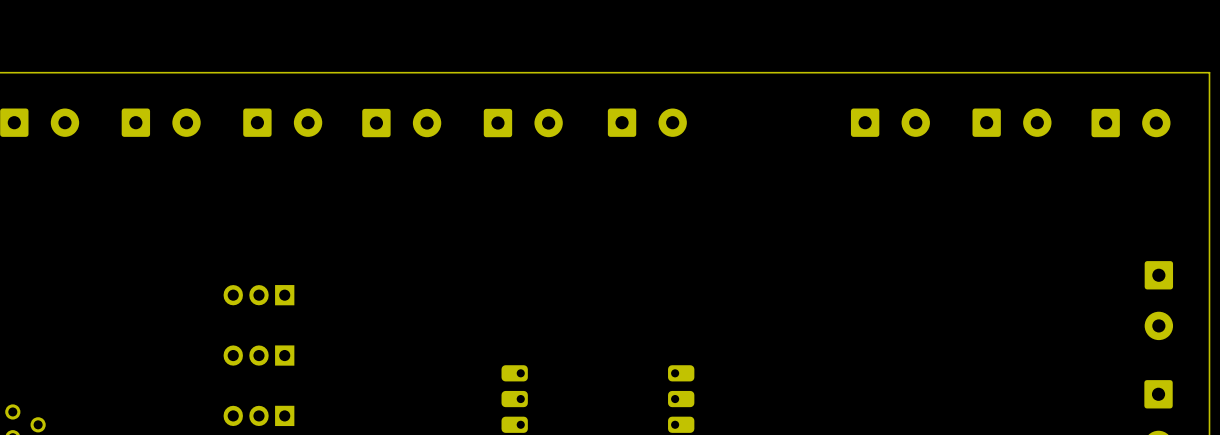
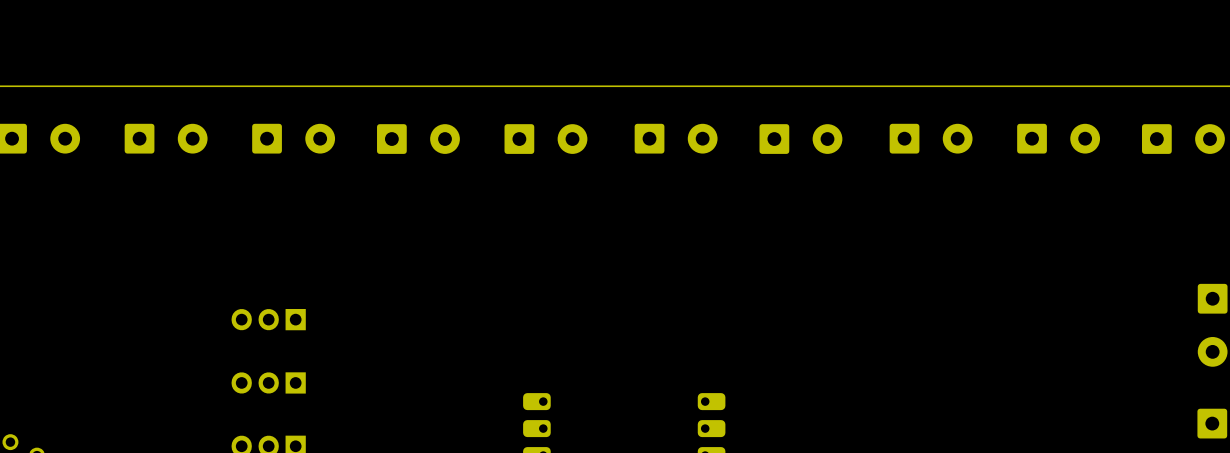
part: none -> (800, 139)

